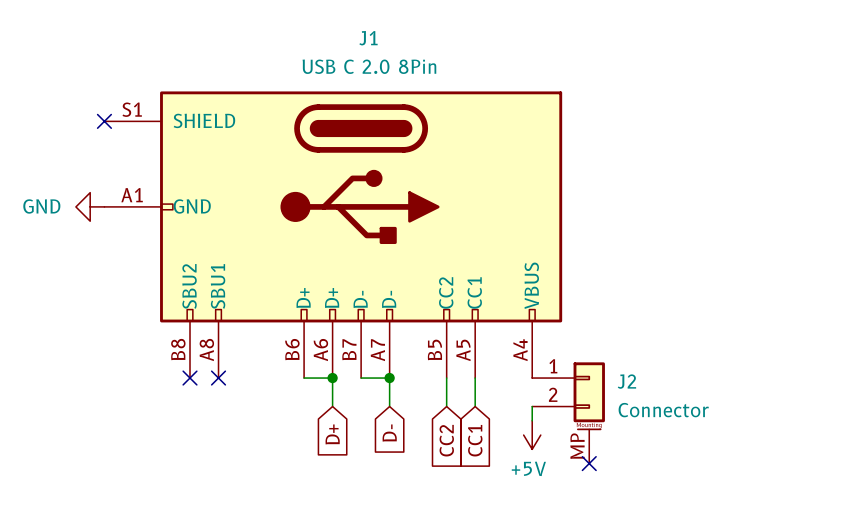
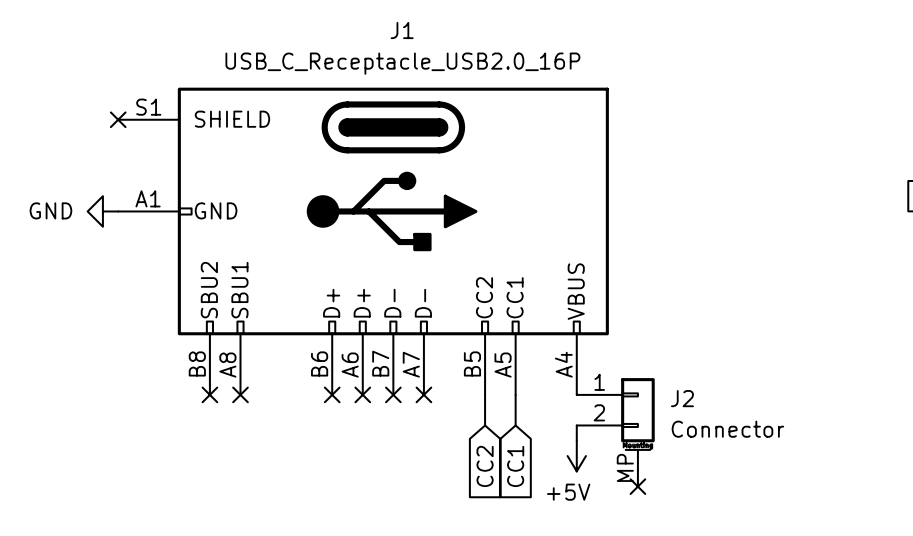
J1 value: USB C 2.0 8Pin (369, 66) -> USB_C_Receptacle_USB2.0_16P (402, 63)
wire: (304, 378) (332, 378) (332, 406) -> none
no-connect mark: none -> (332, 394)
junction: (332, 378) -> none
no-connect mark: none -> (362, 394)
wire: (361, 378) (389, 378) (389, 406) -> none
no-connect mark: none -> (393, 394)
junction: (389, 378) -> none
no-connect mark: none -> (423, 394)
global label: D- (389, 433) -> none
global label: D+ (332, 434) -> none

